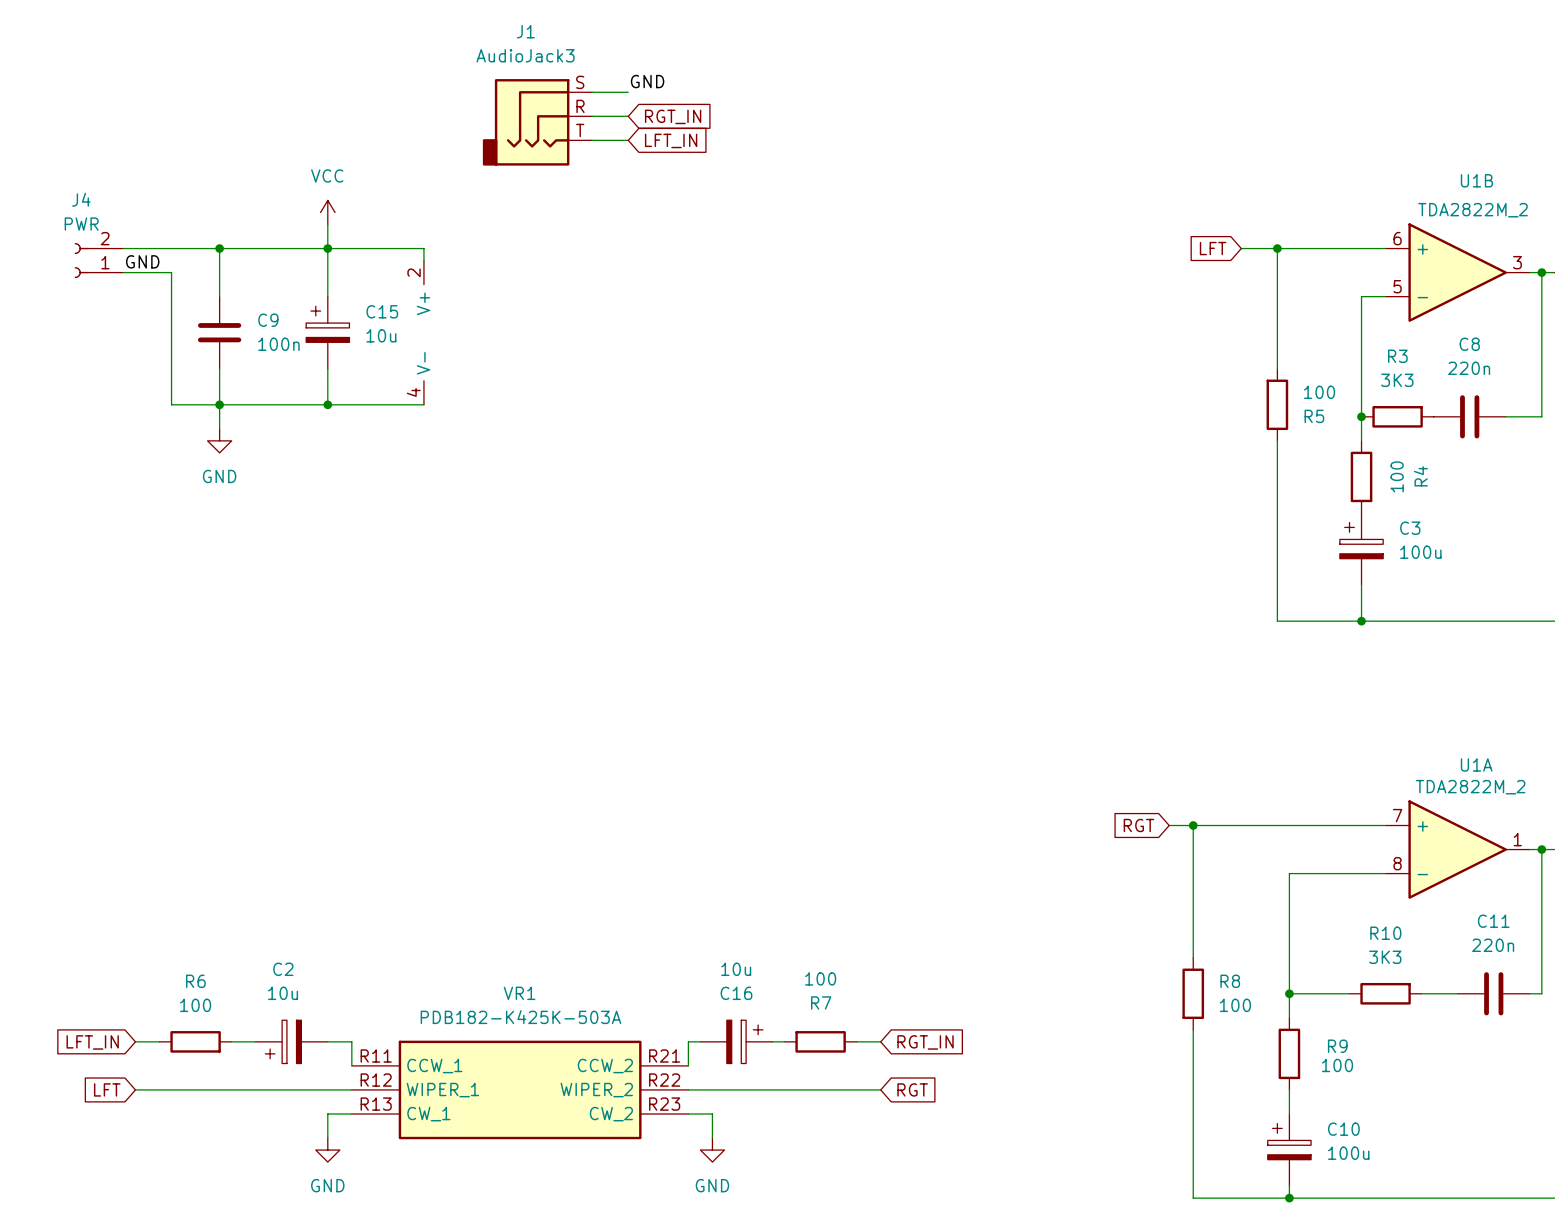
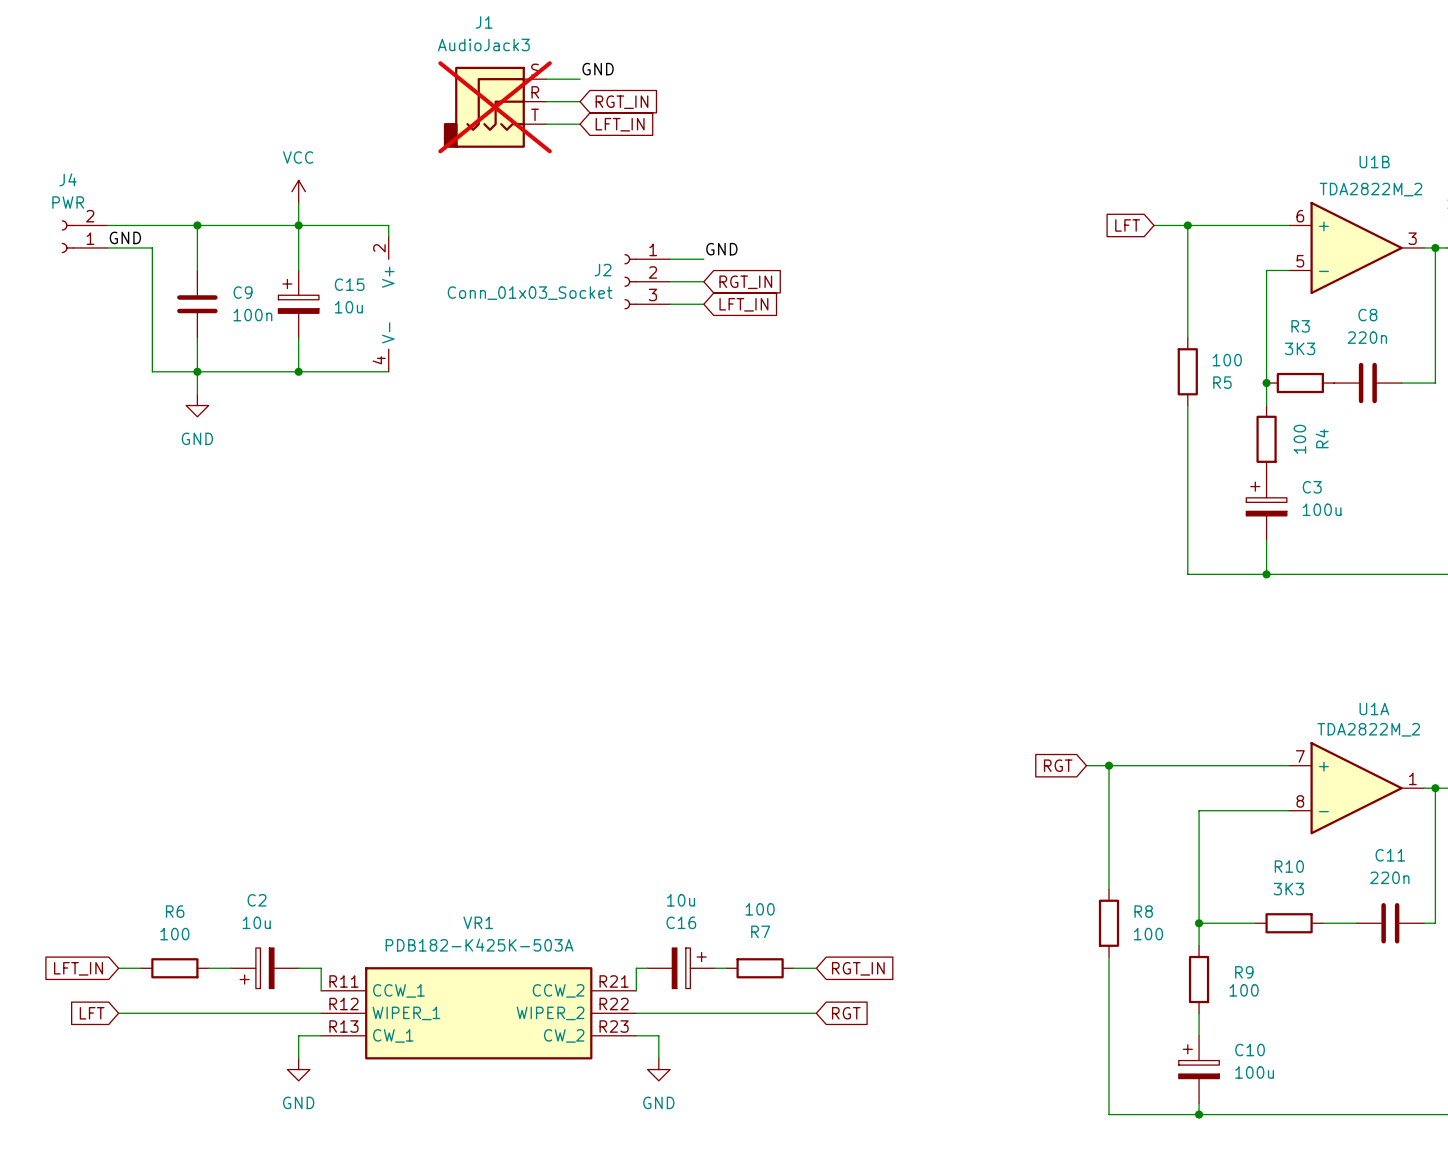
J1 do-not-place cross: none -> (495, 107)
label: none -> GND (721, 249)
wire: none -> (670, 259) (703, 259)
J2: none -> Conn_01x03_Socket (647, 281)
wire: none -> (670, 281) (703, 281)
global label: none -> RGT_IN (745, 282)
wire: none -> (670, 304) (703, 304)
global label: none -> LFT_IN (743, 304)

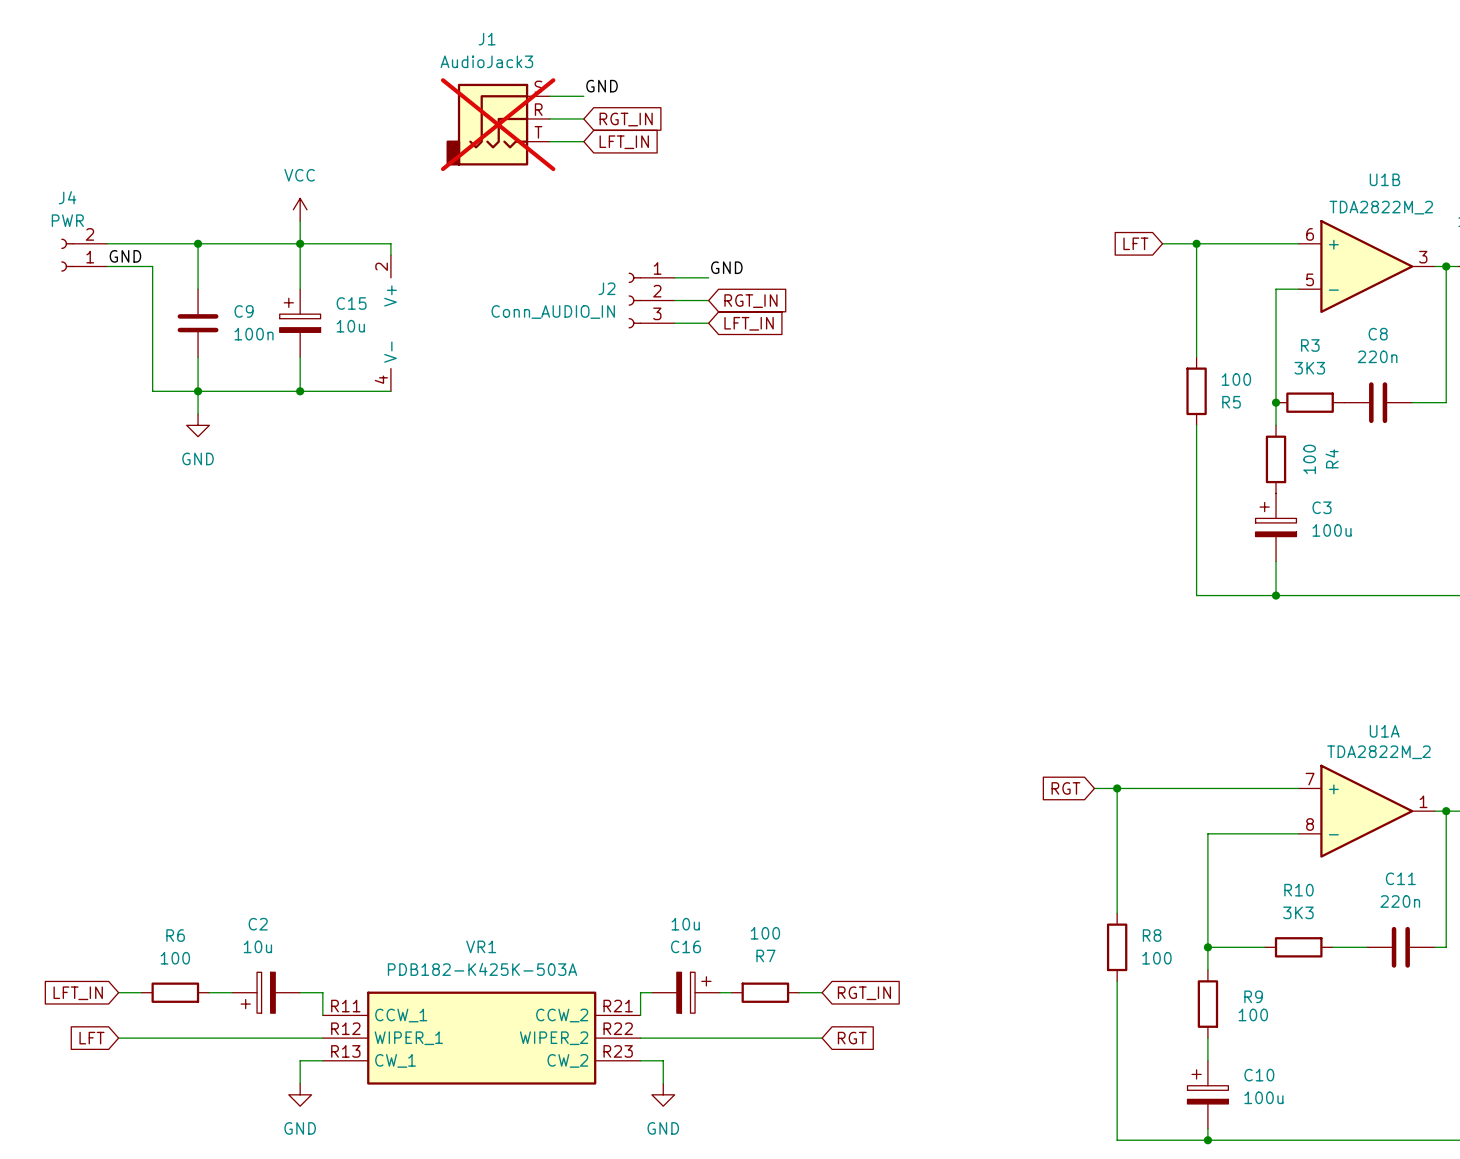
J2 value: Conn_01x03_Socket (530, 293) -> Conn_AUDIO_IN (553, 312)

